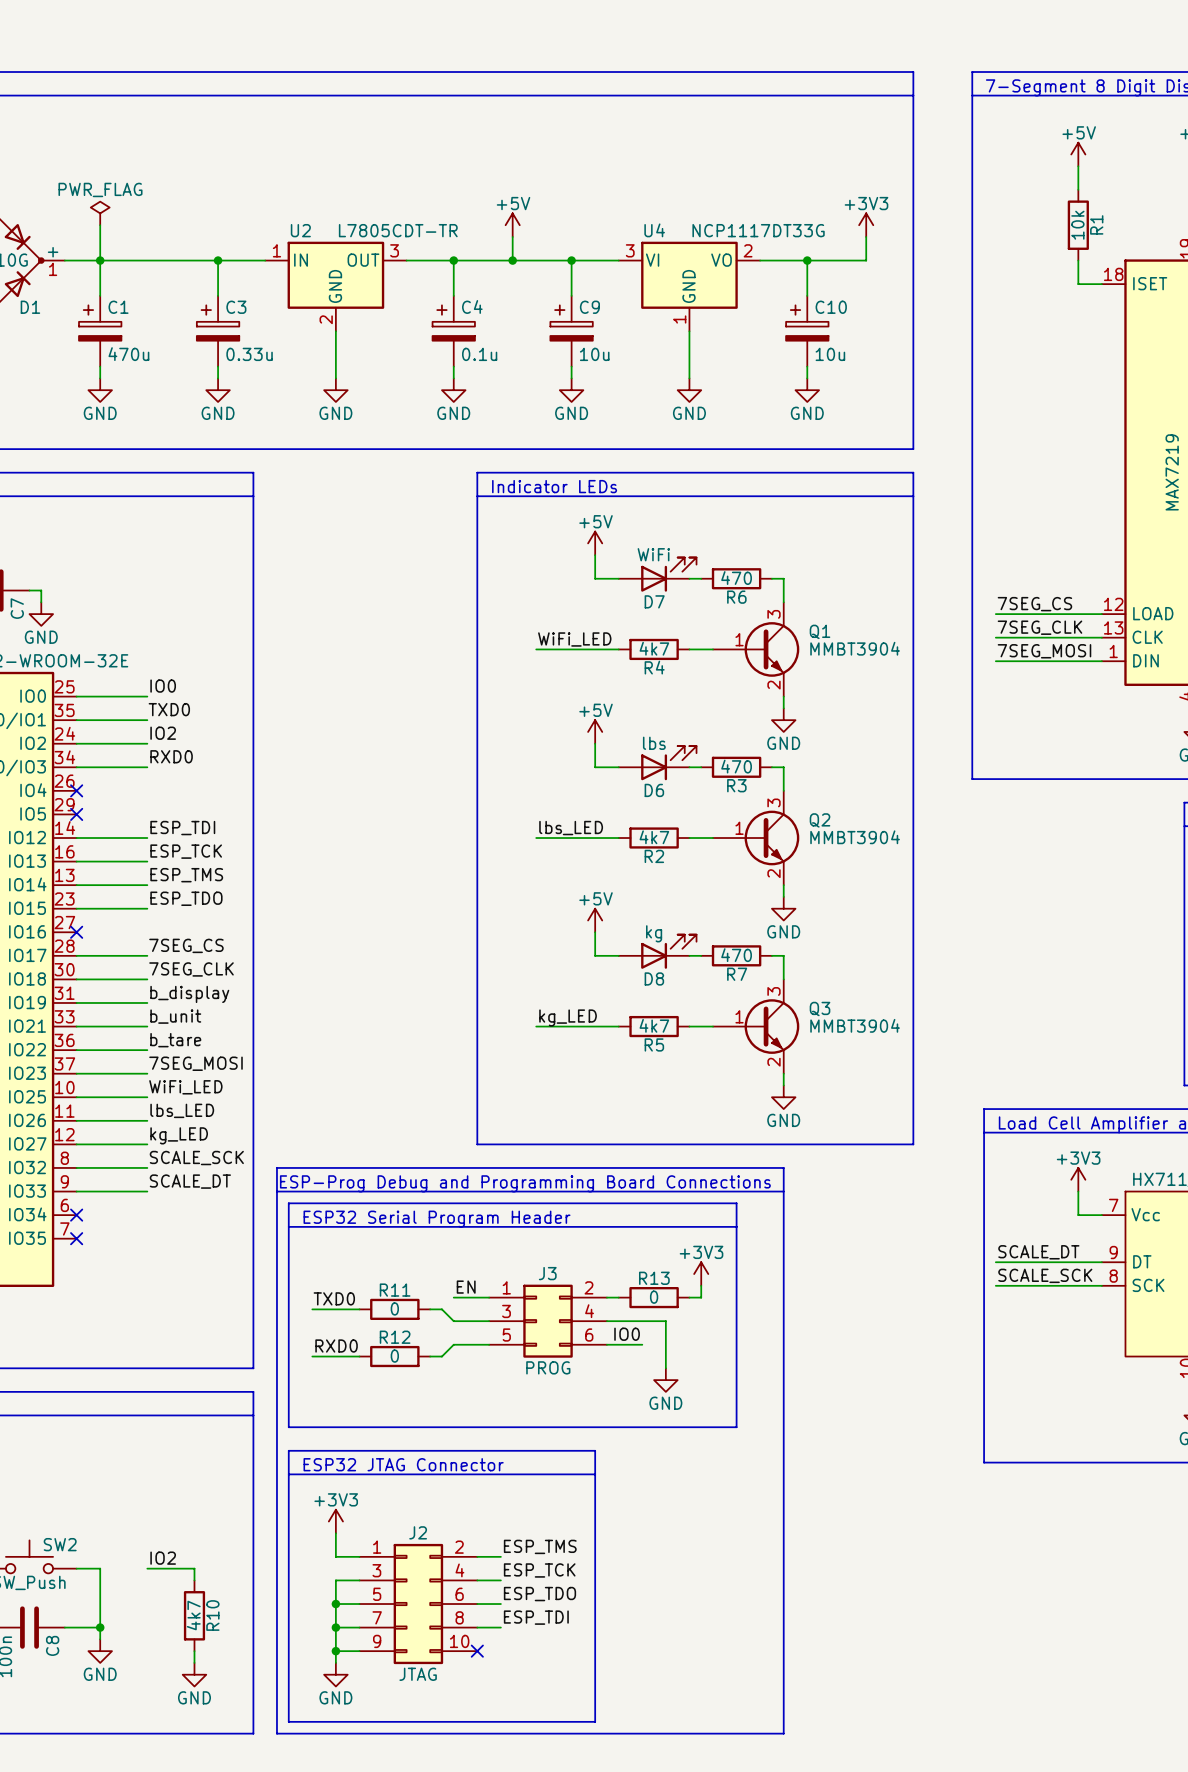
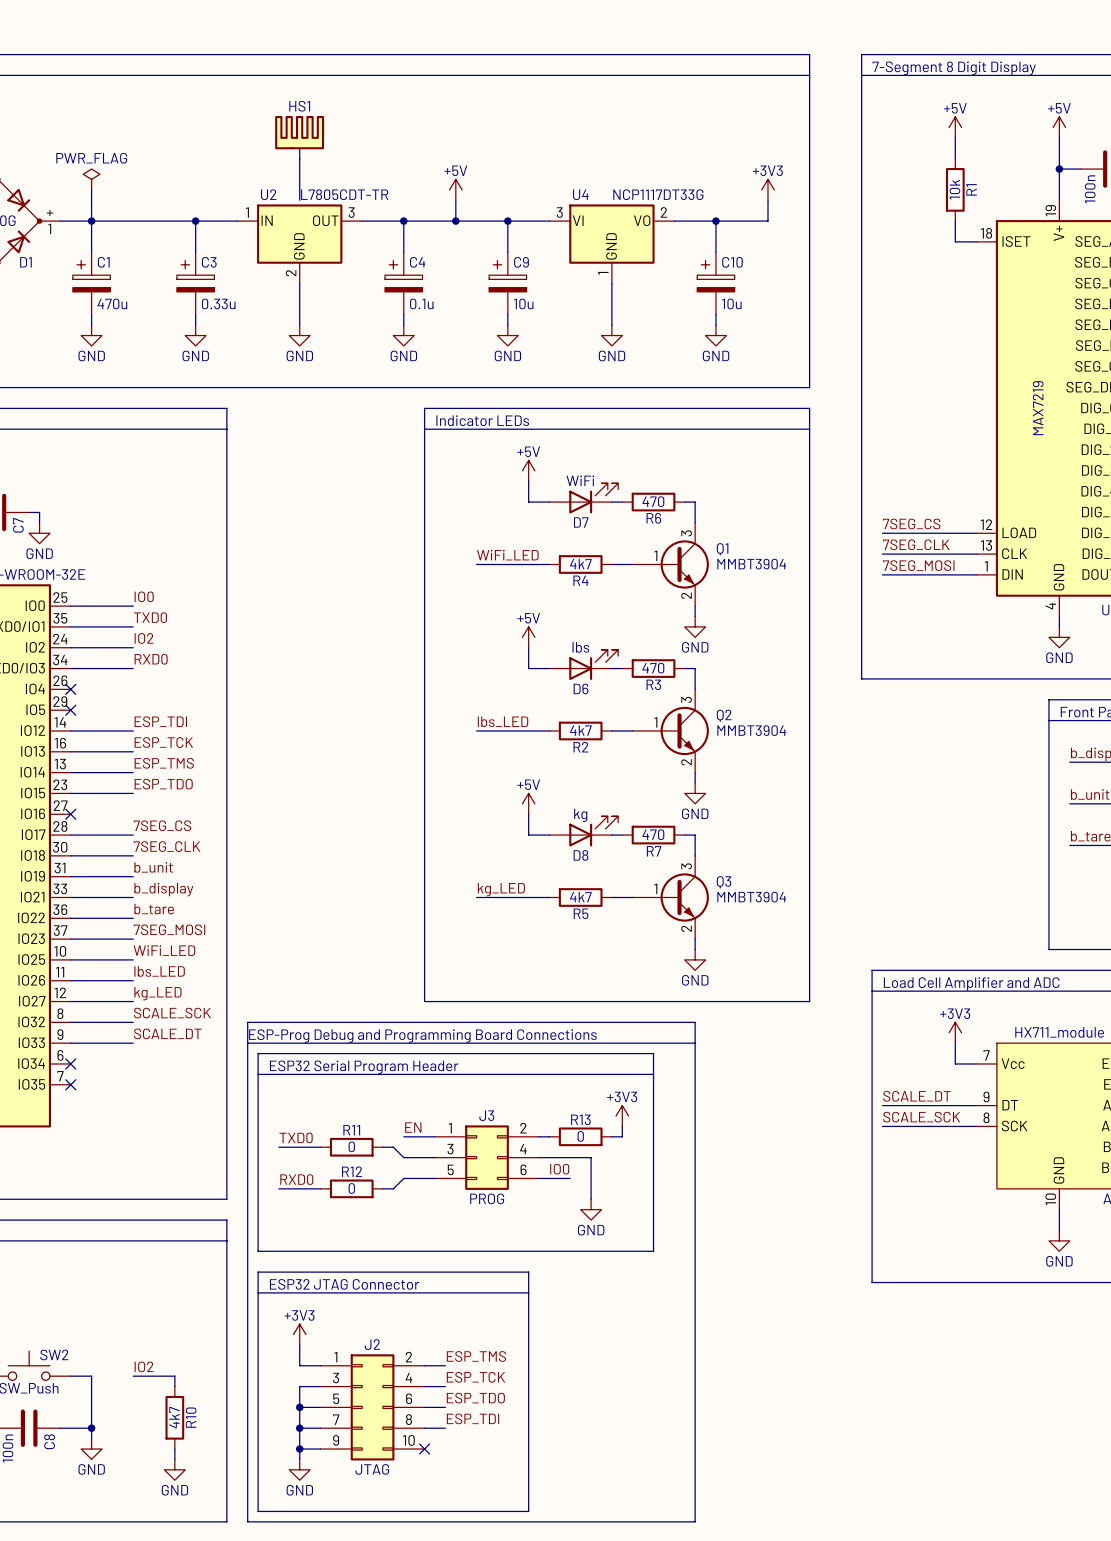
HS1: none -> (299, 132)
line: none -> (299, 148) (299, 200)
label: b_display (189, 994) -> b_unit (153, 867)
label: b_unit (175, 1016) -> b_display (163, 889)

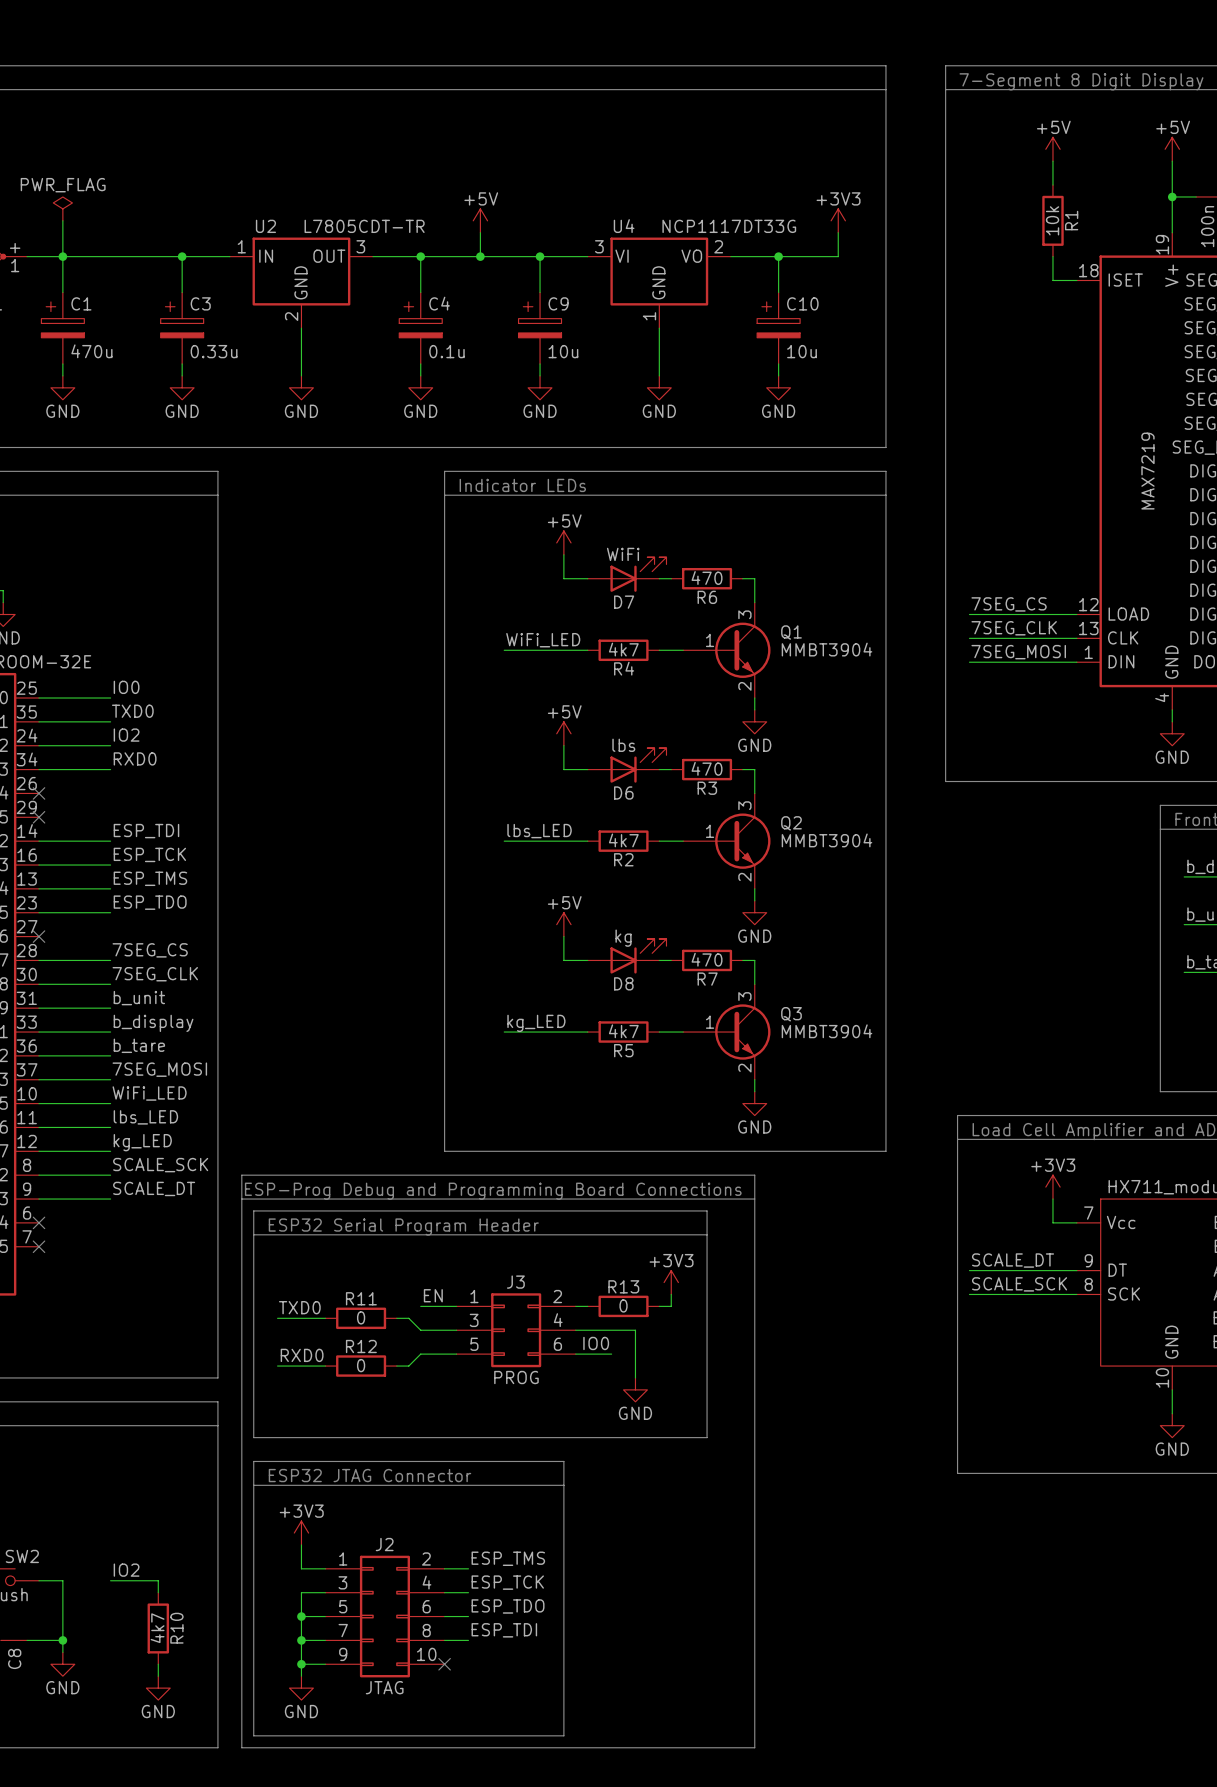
HS1: (299, 132) -> none
line: (299, 148) (299, 200) -> none

